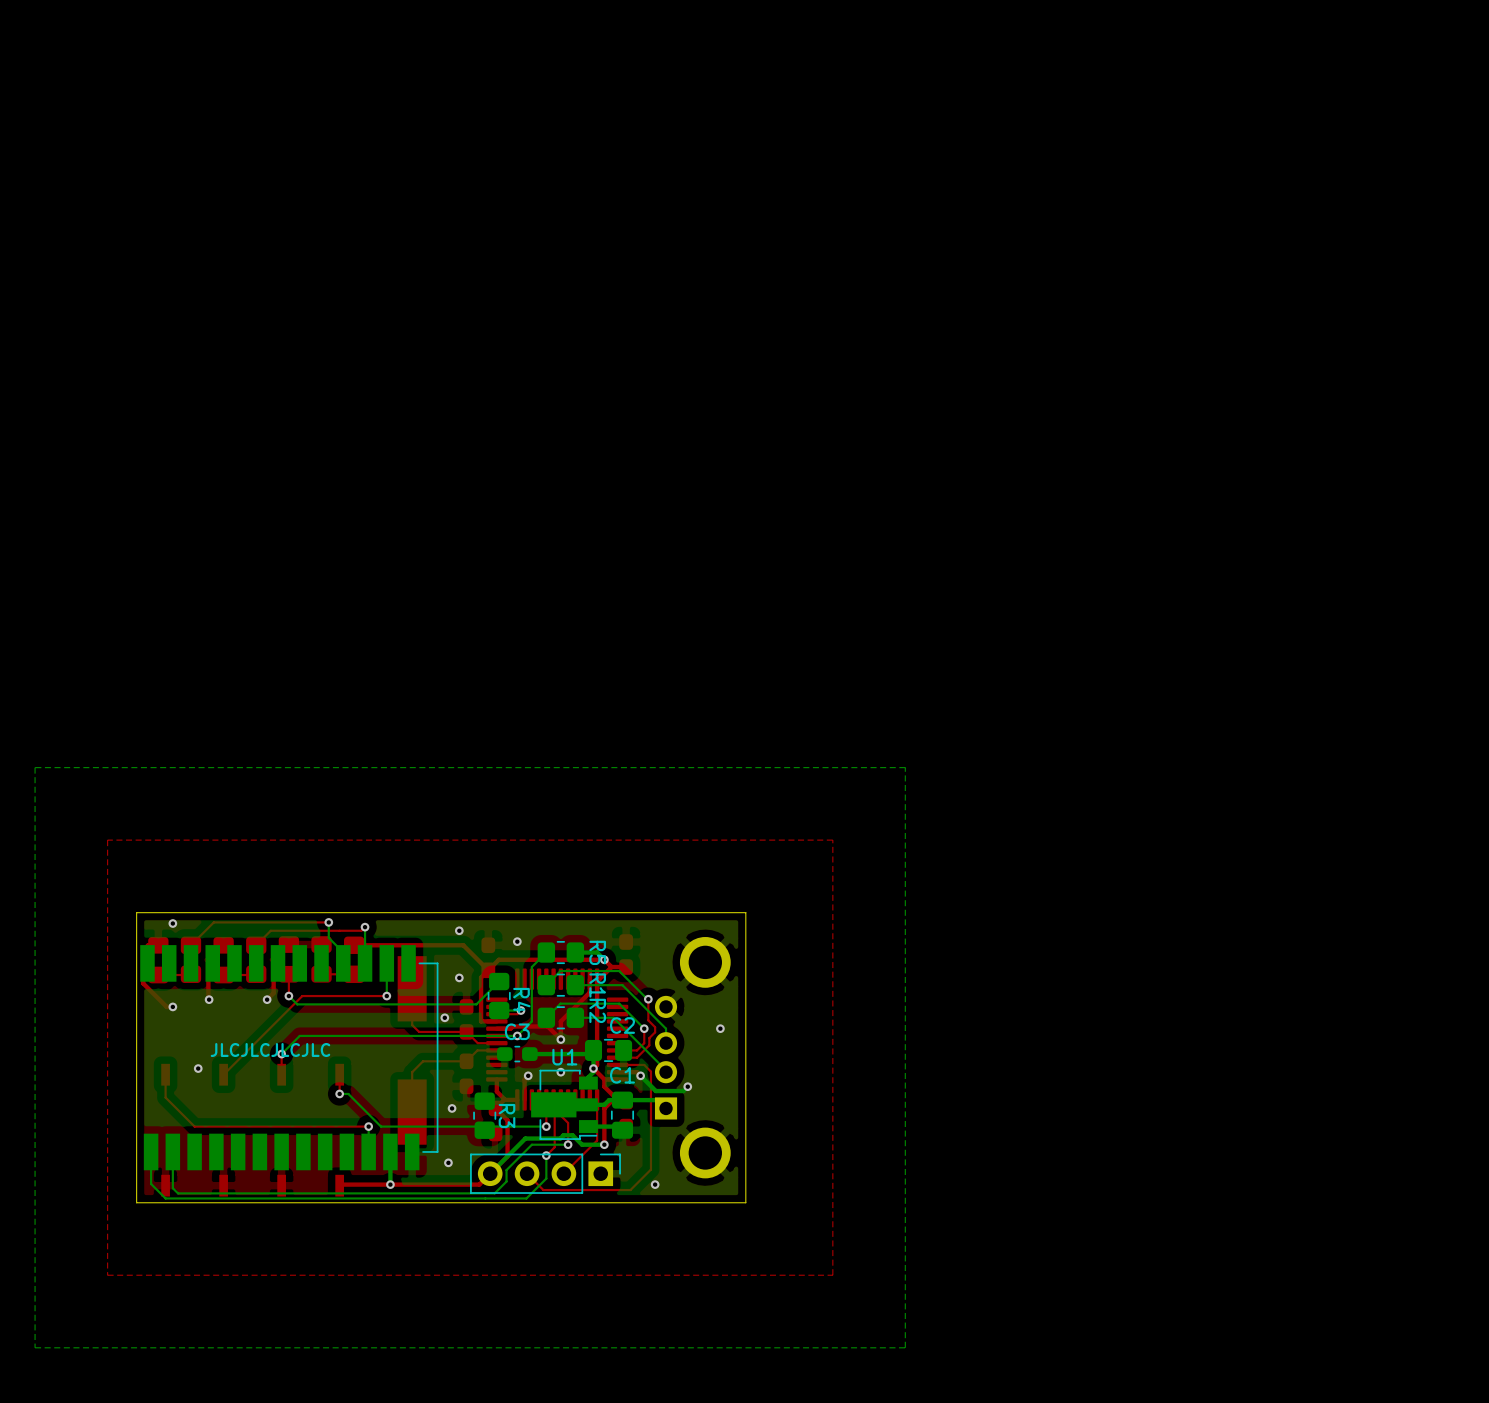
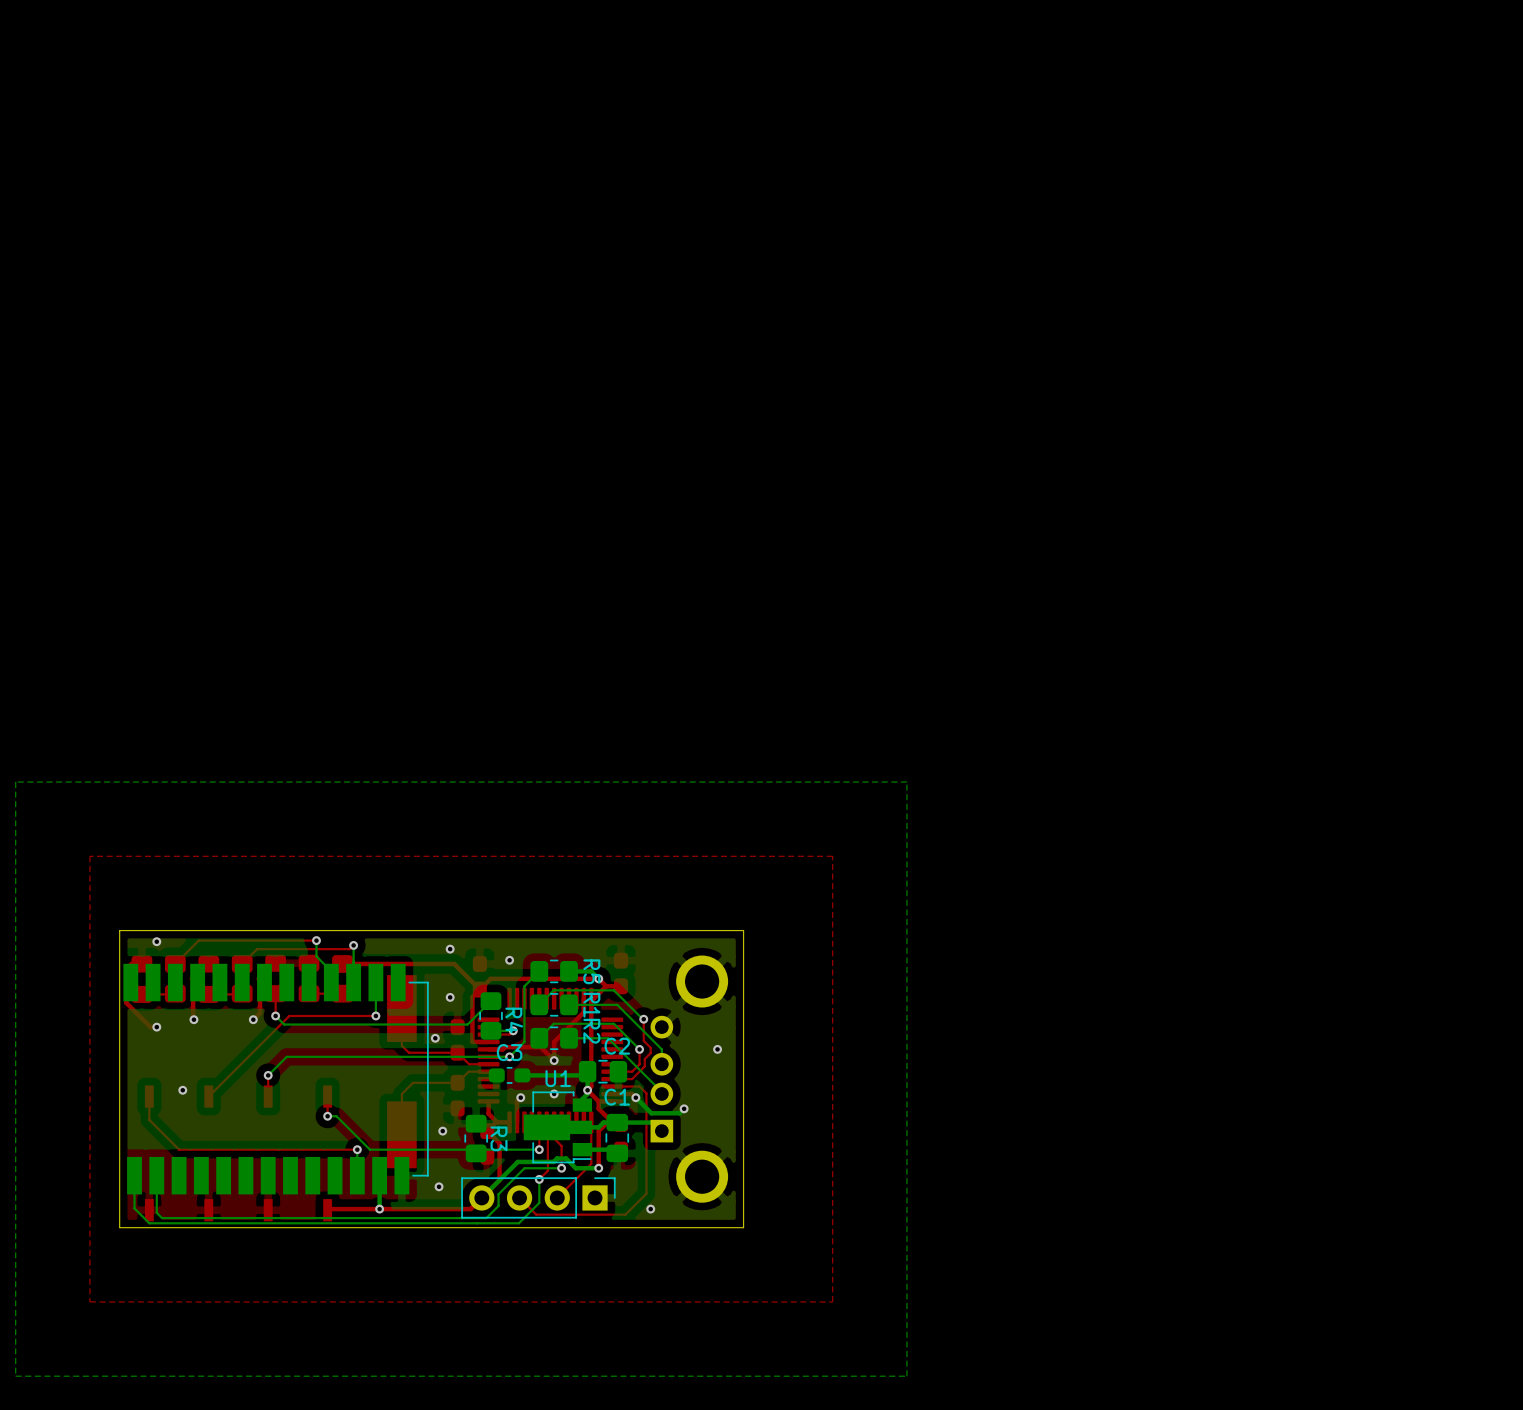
text: JLCJLCJLCJLC (270, 1049) -> none

